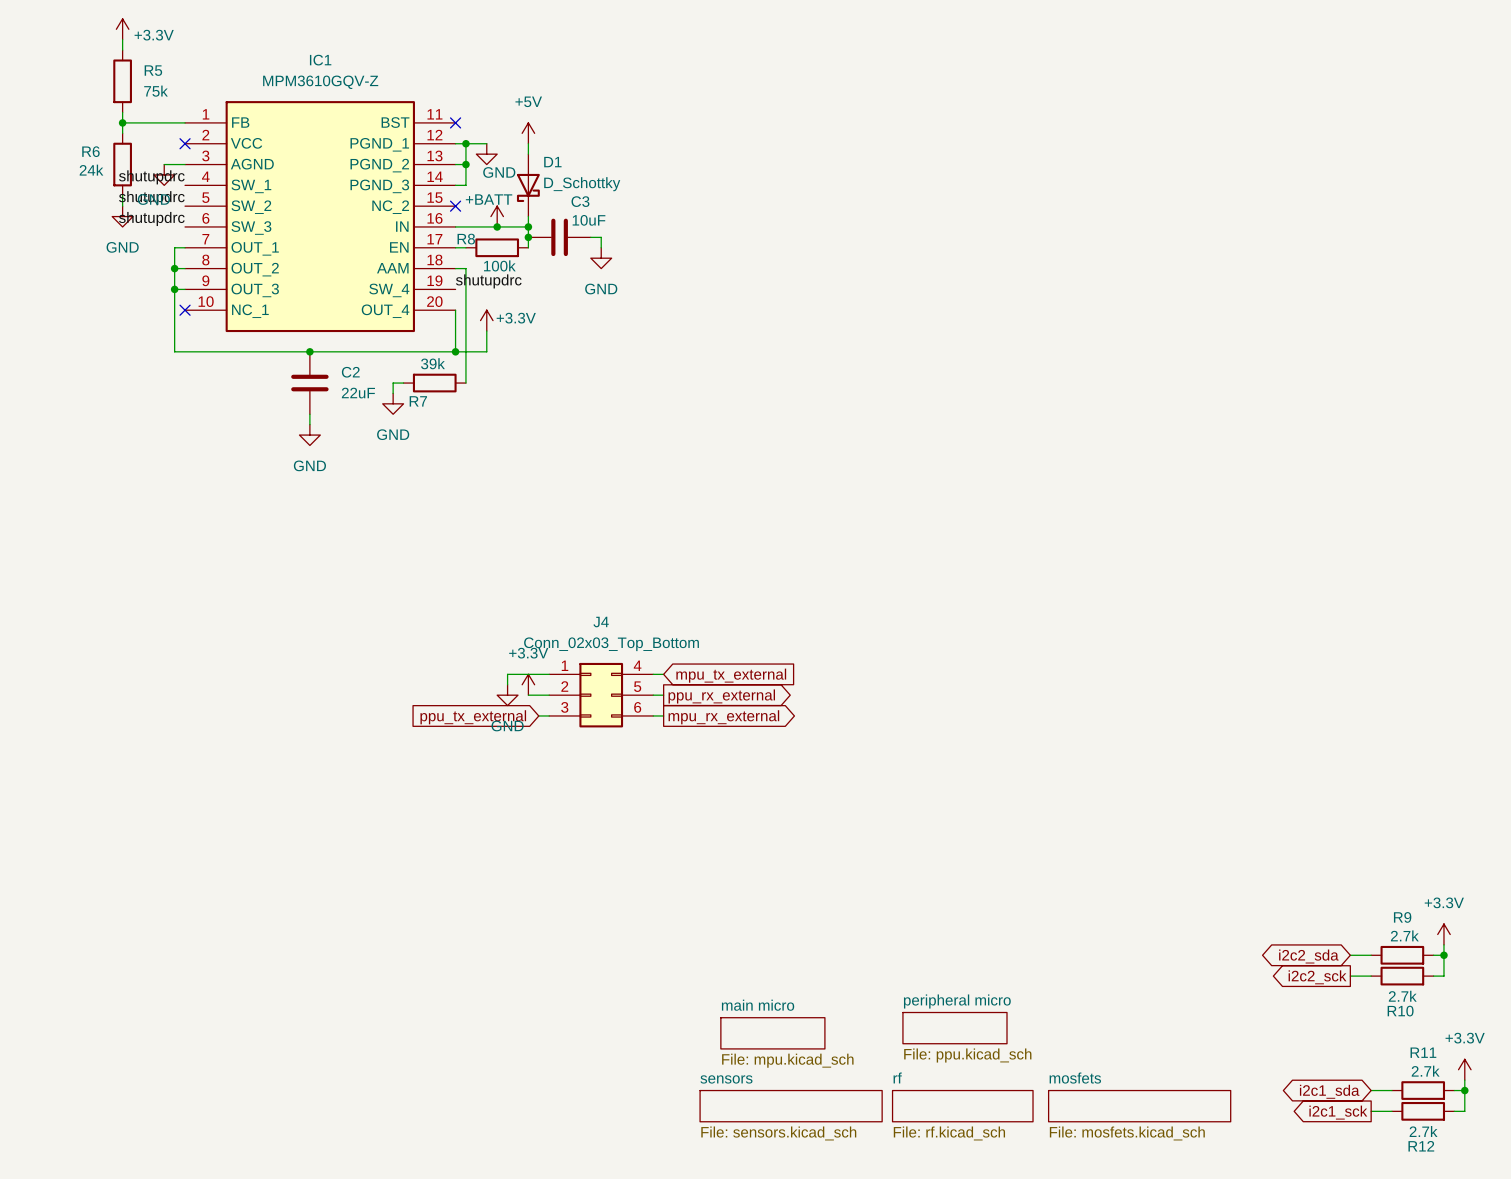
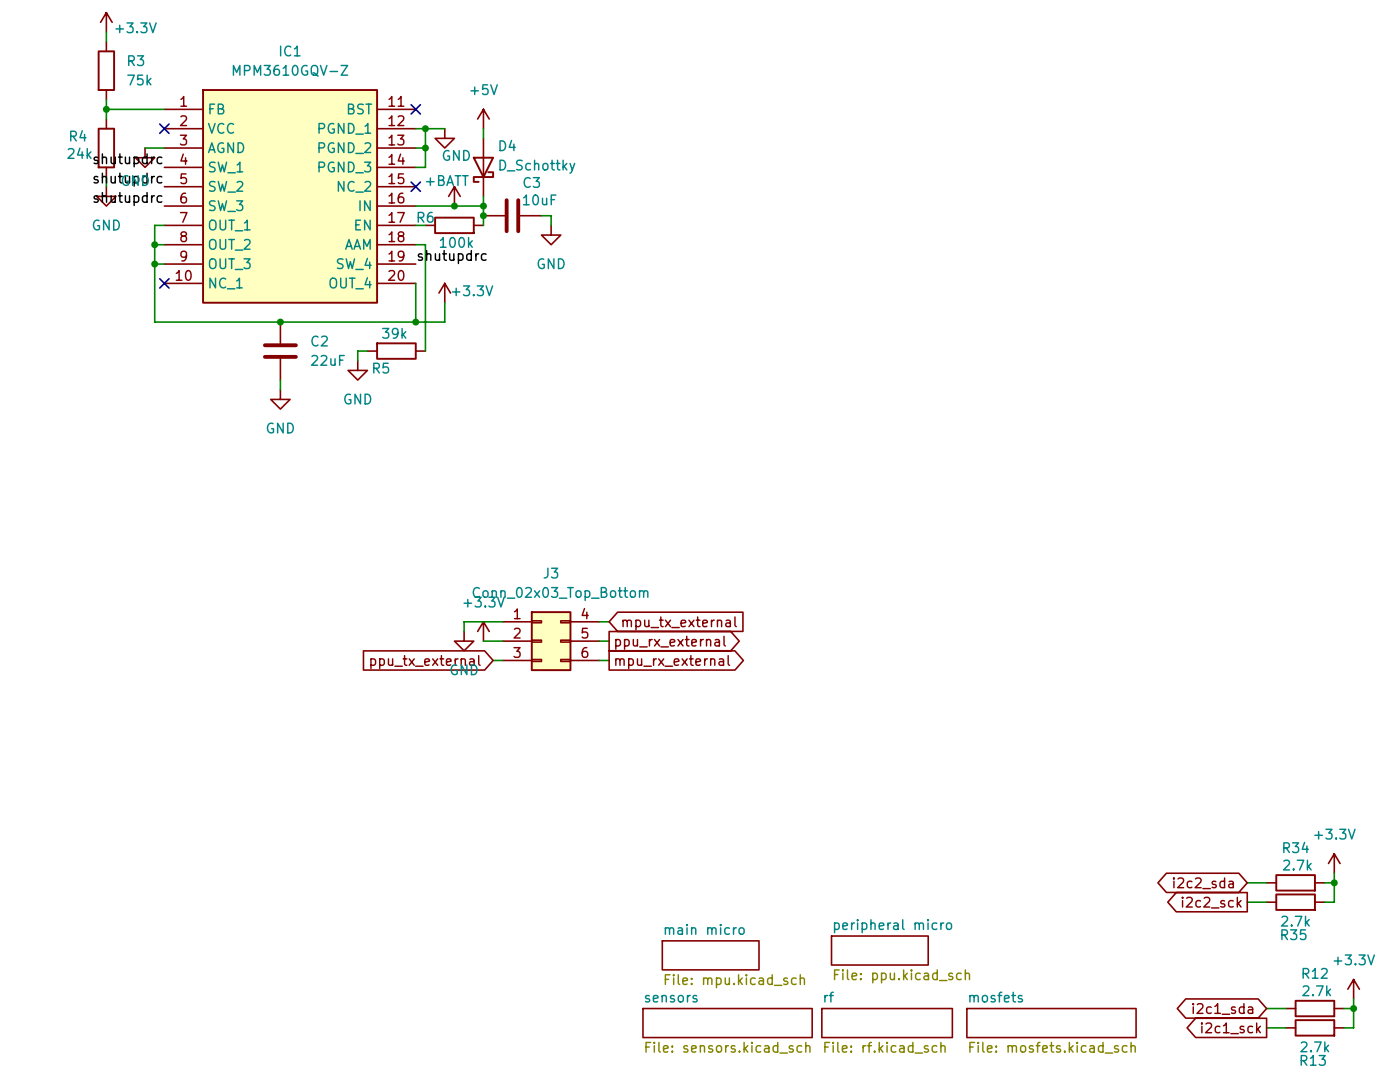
R5 name: R5 (153, 70) -> R3 (136, 60)
R6 name: R6 (90, 151) -> R4 (78, 135)
D1 name: D1 (552, 162) -> D4 (507, 145)
R8 name: R8 (466, 239) -> R6 (425, 217)
R7 name: R7 (418, 401) -> R5 (381, 368)
J4 name: J4 (601, 622) -> J3 (550, 573)
R9 name: R9 (1402, 917) -> R34 (1296, 847)
R10 name: R10 (1400, 1011) -> R35 (1293, 934)
R11 name: R11 (1423, 1052) -> R12 (1315, 973)
R12 name: R12 (1421, 1146) -> R13 (1313, 1060)

